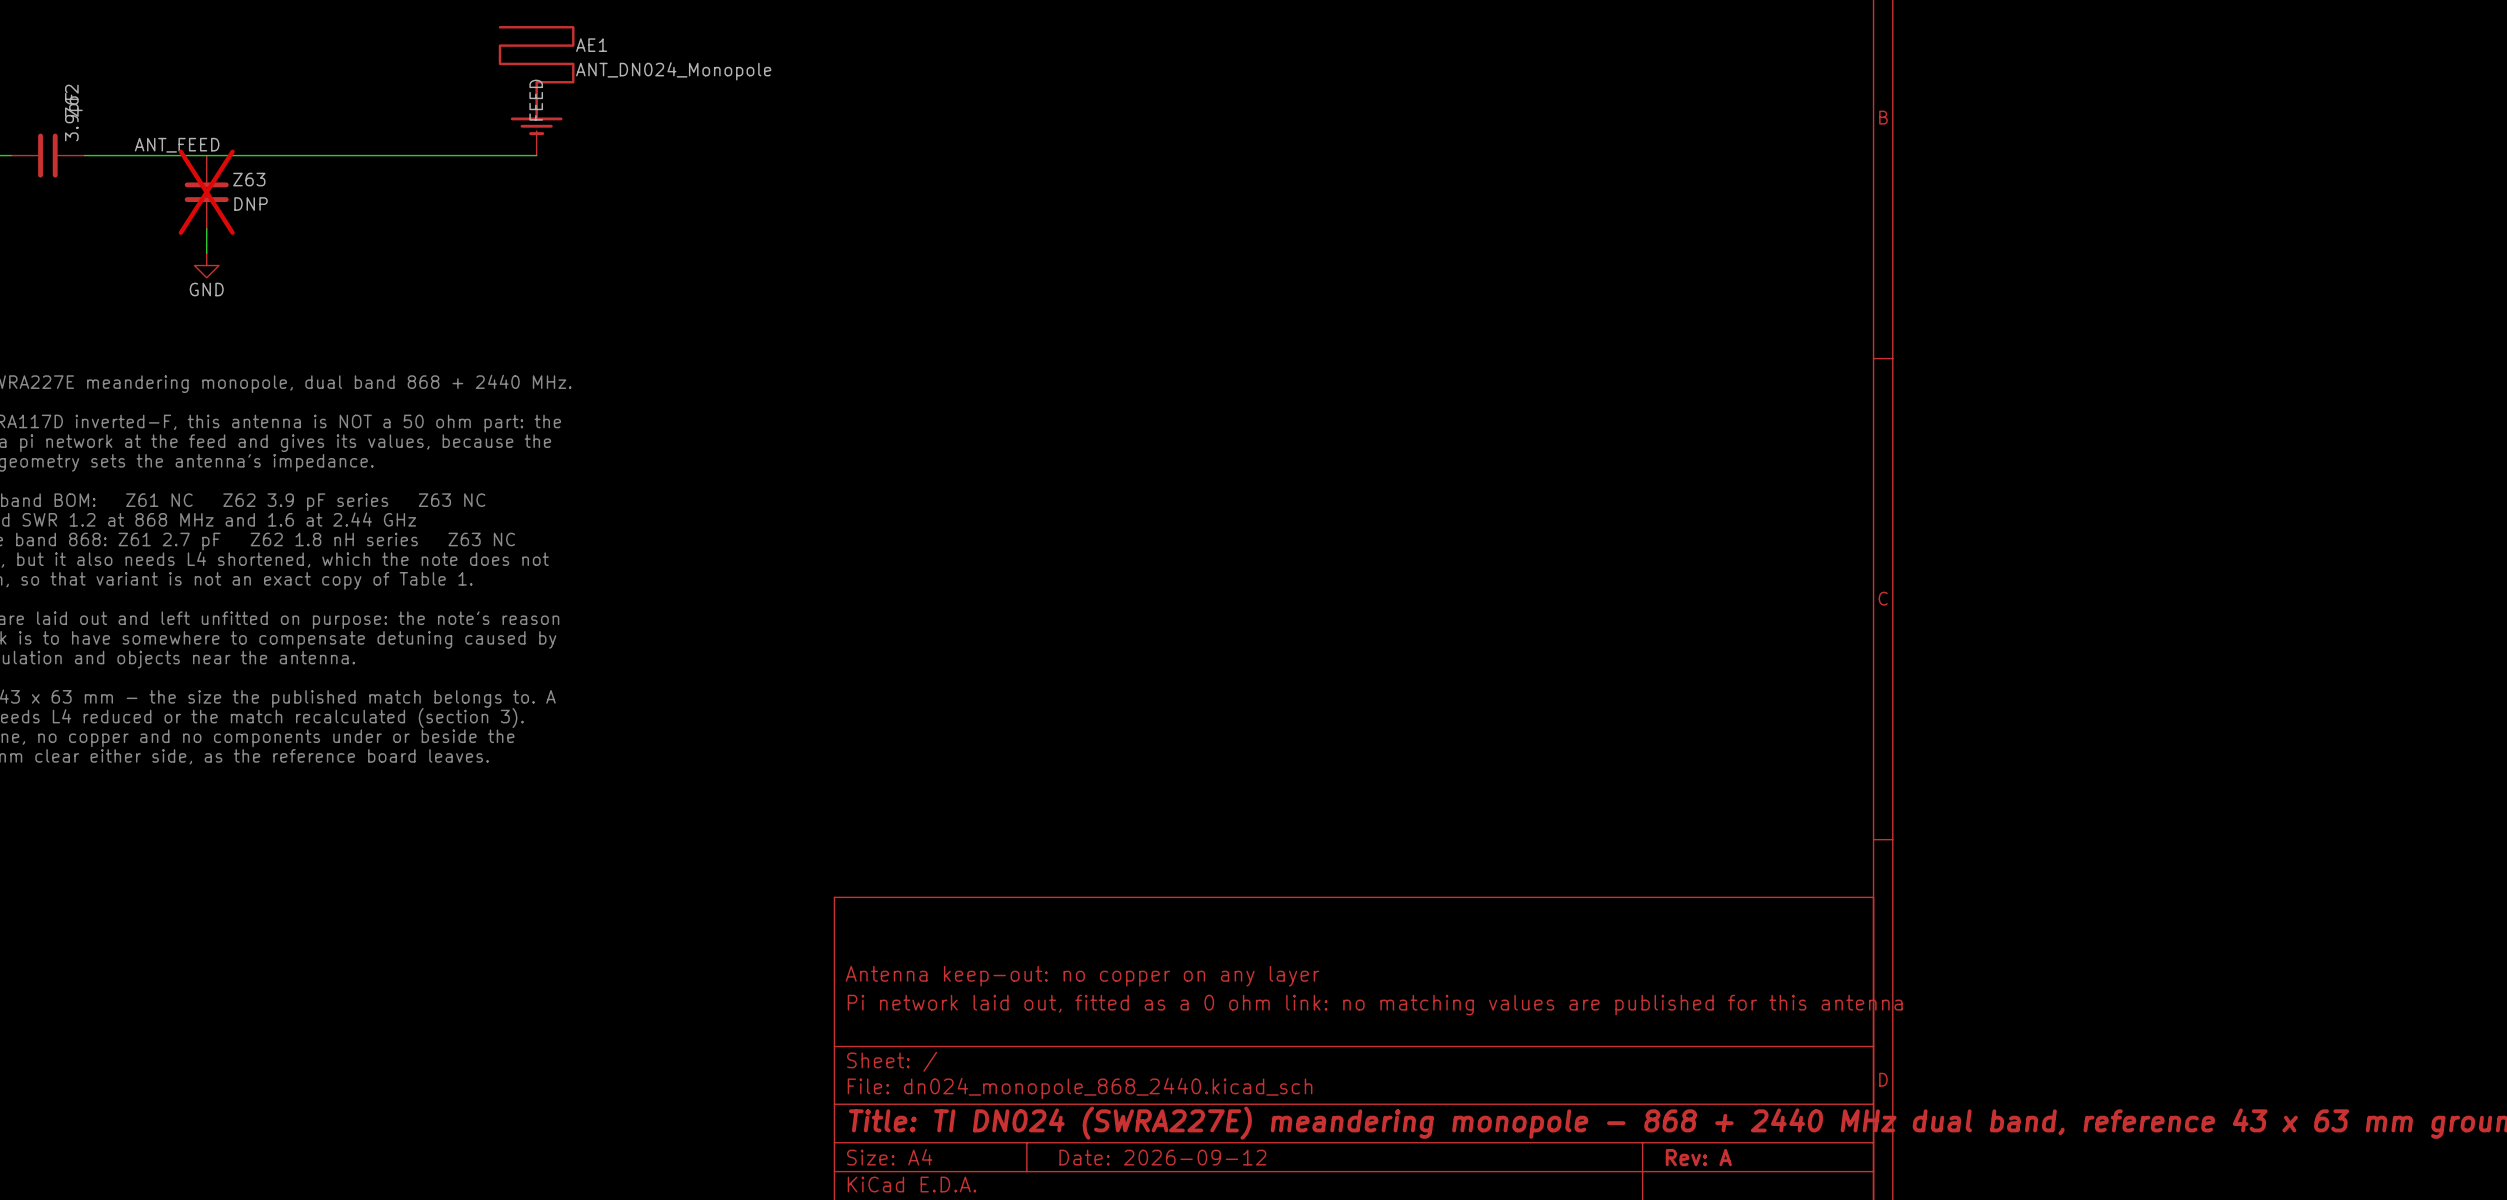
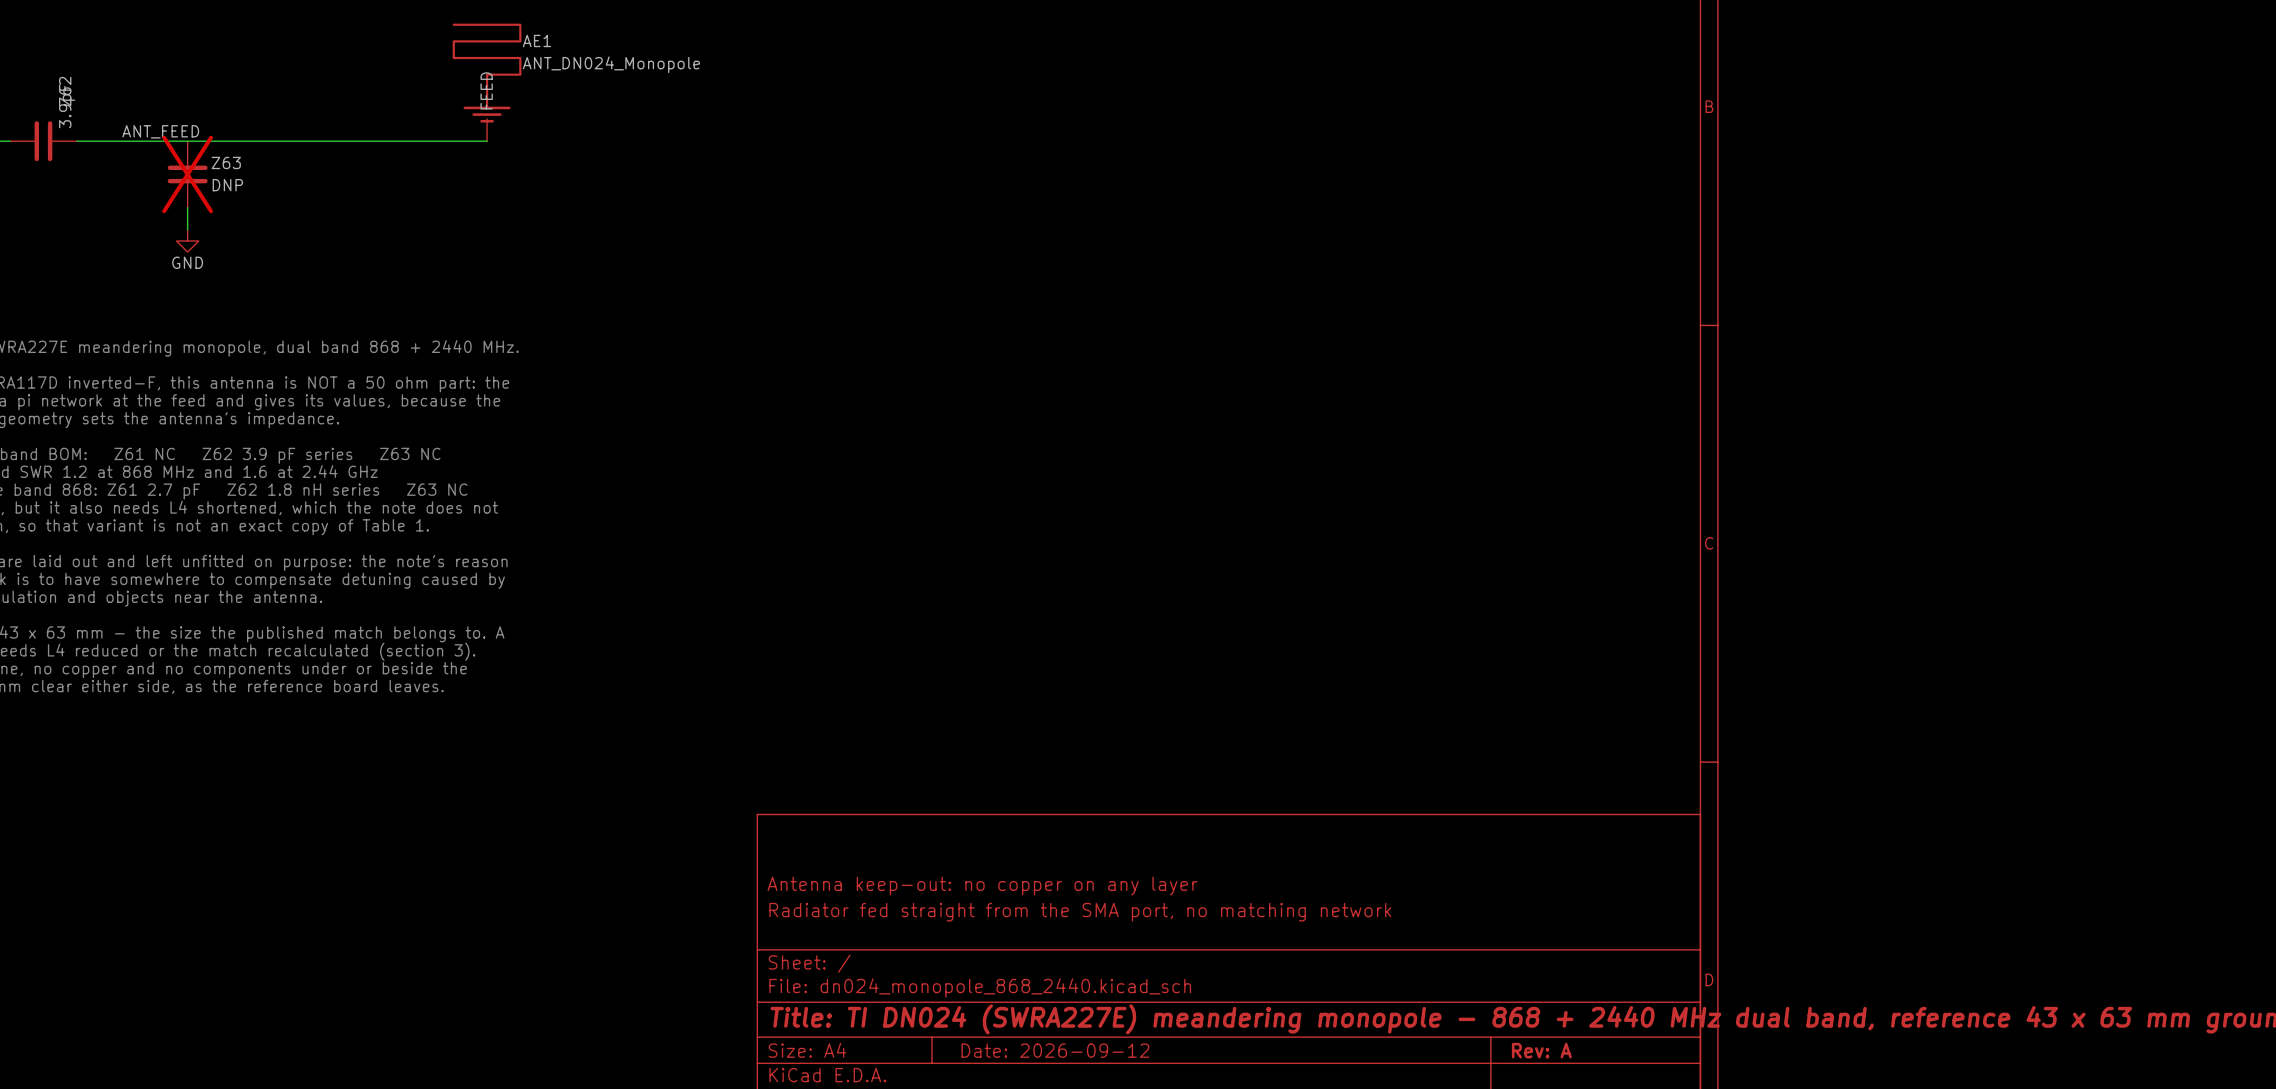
title block: Pi network laid out, fitted as a 0 ohm link: no matching values are published for this antenna (1375, 1005) -> Radiator fed straight from the SMA port, no matching network (1080, 912)

